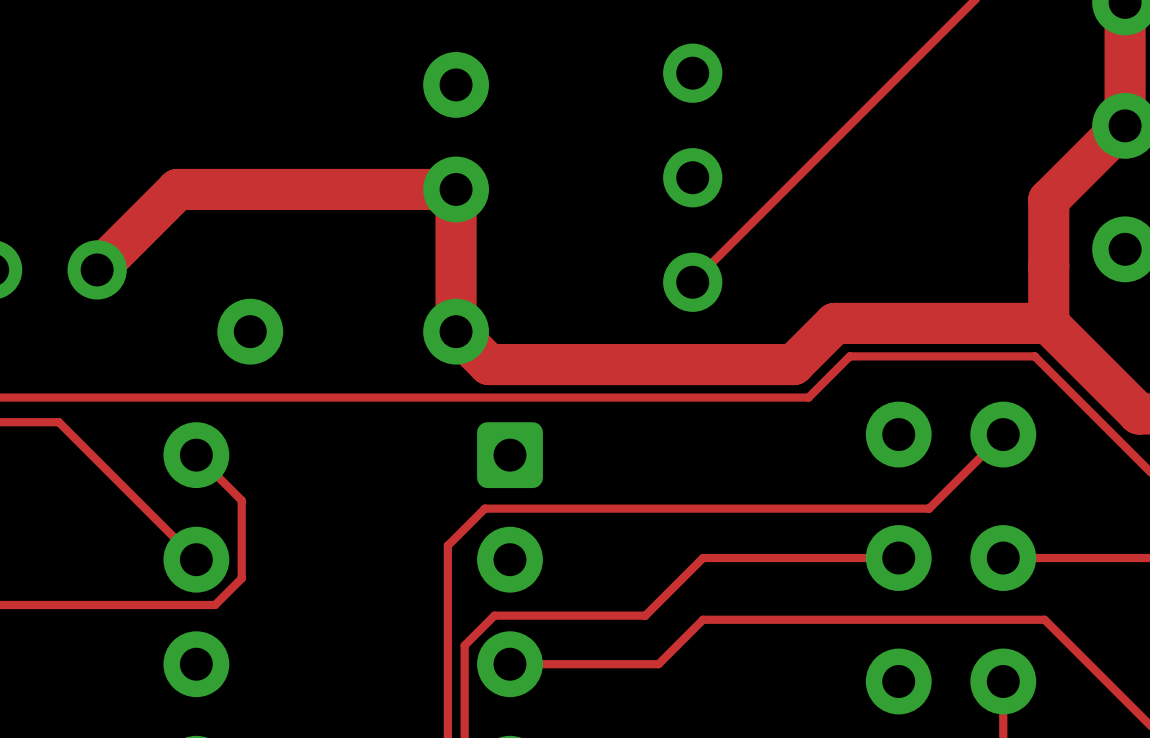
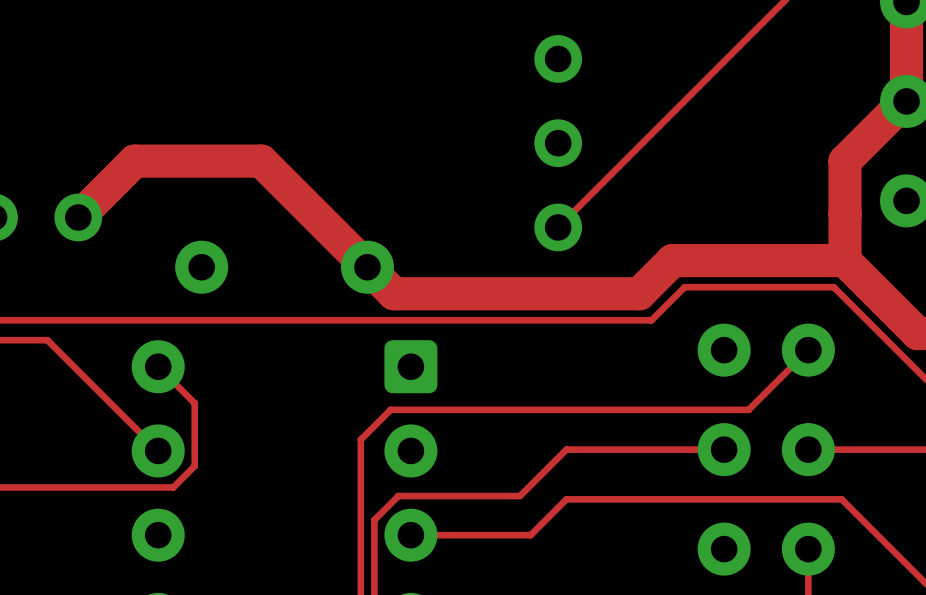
part: (456, 137) -> none
track: (167, 199) (177, 189) (456, 189) (456, 331) -> (134, 161) (261, 161) (367, 267)

